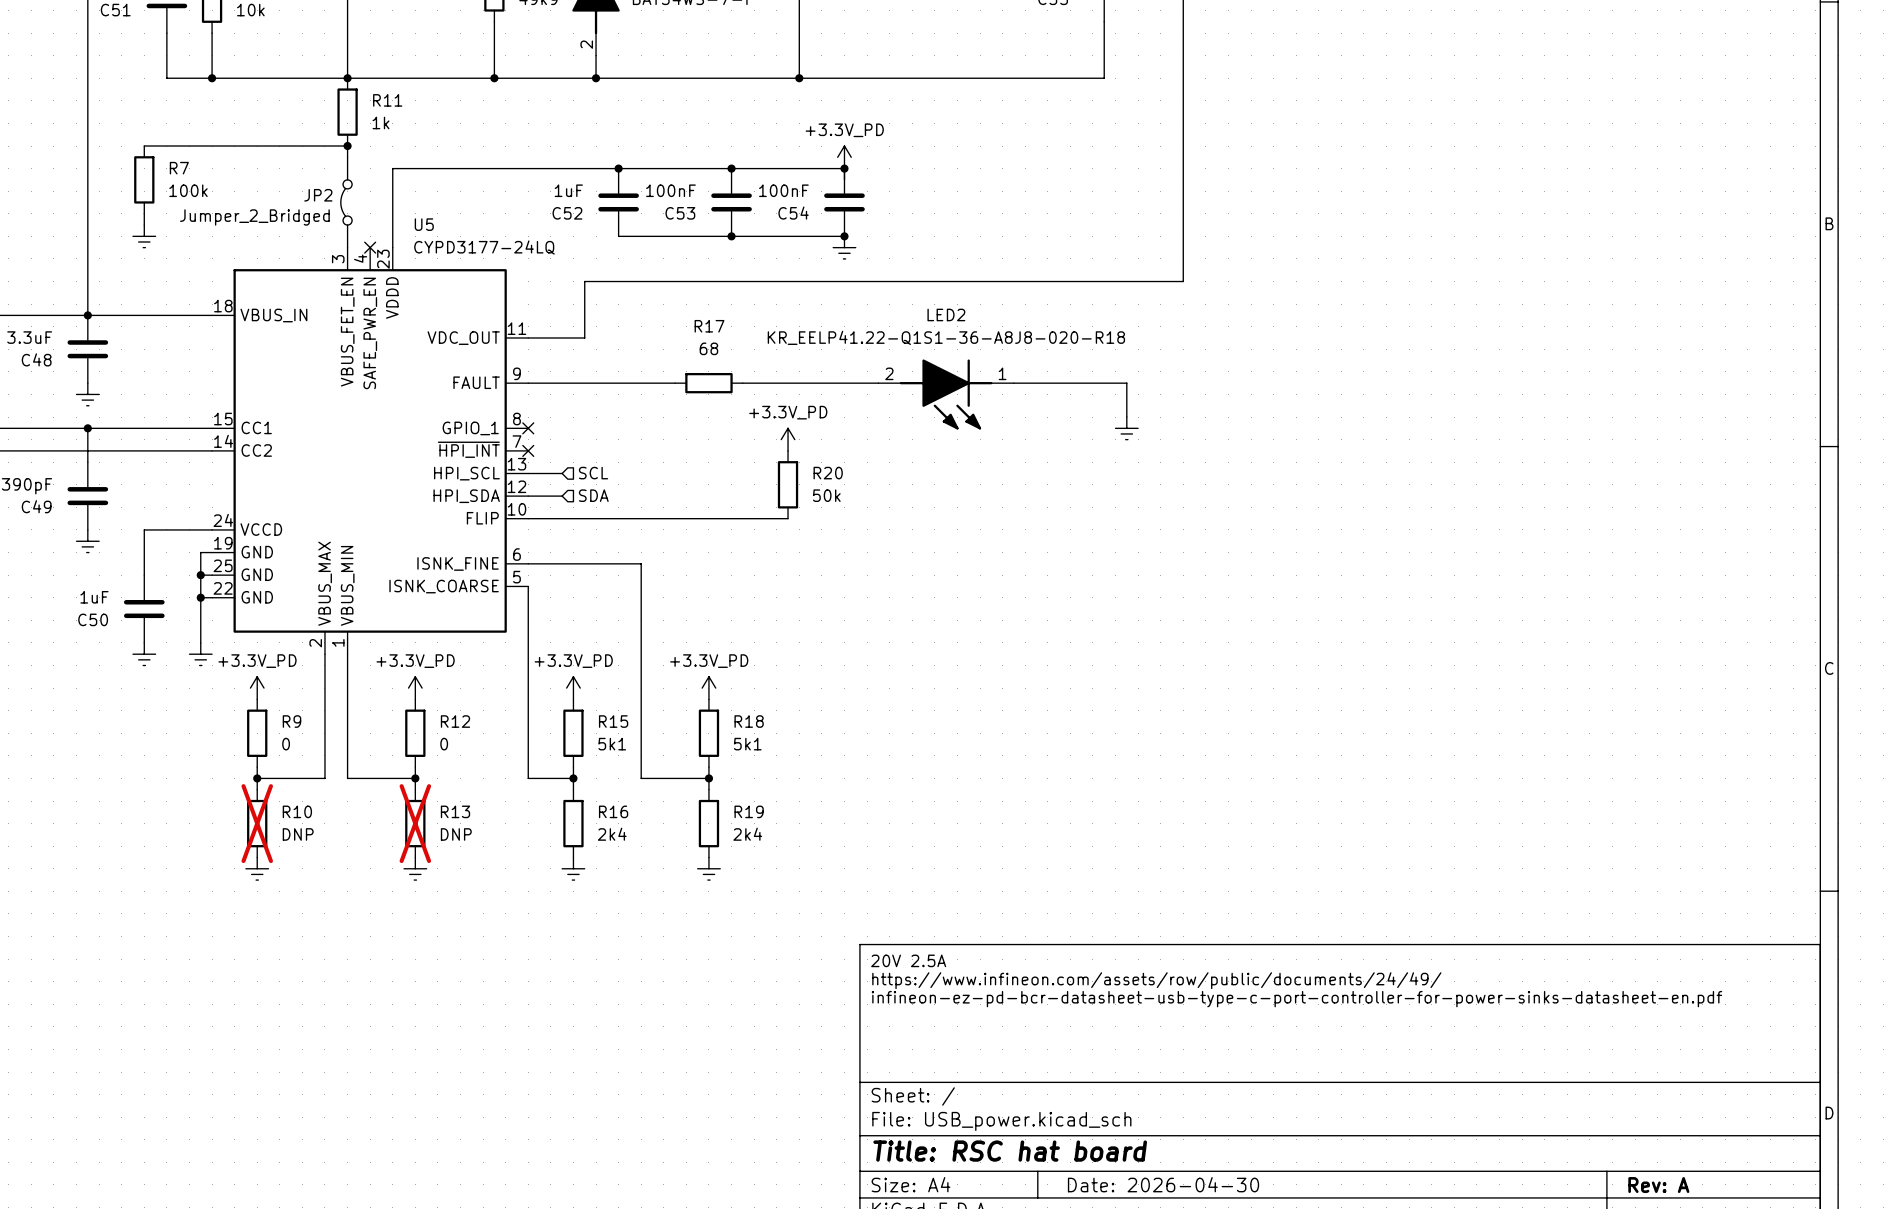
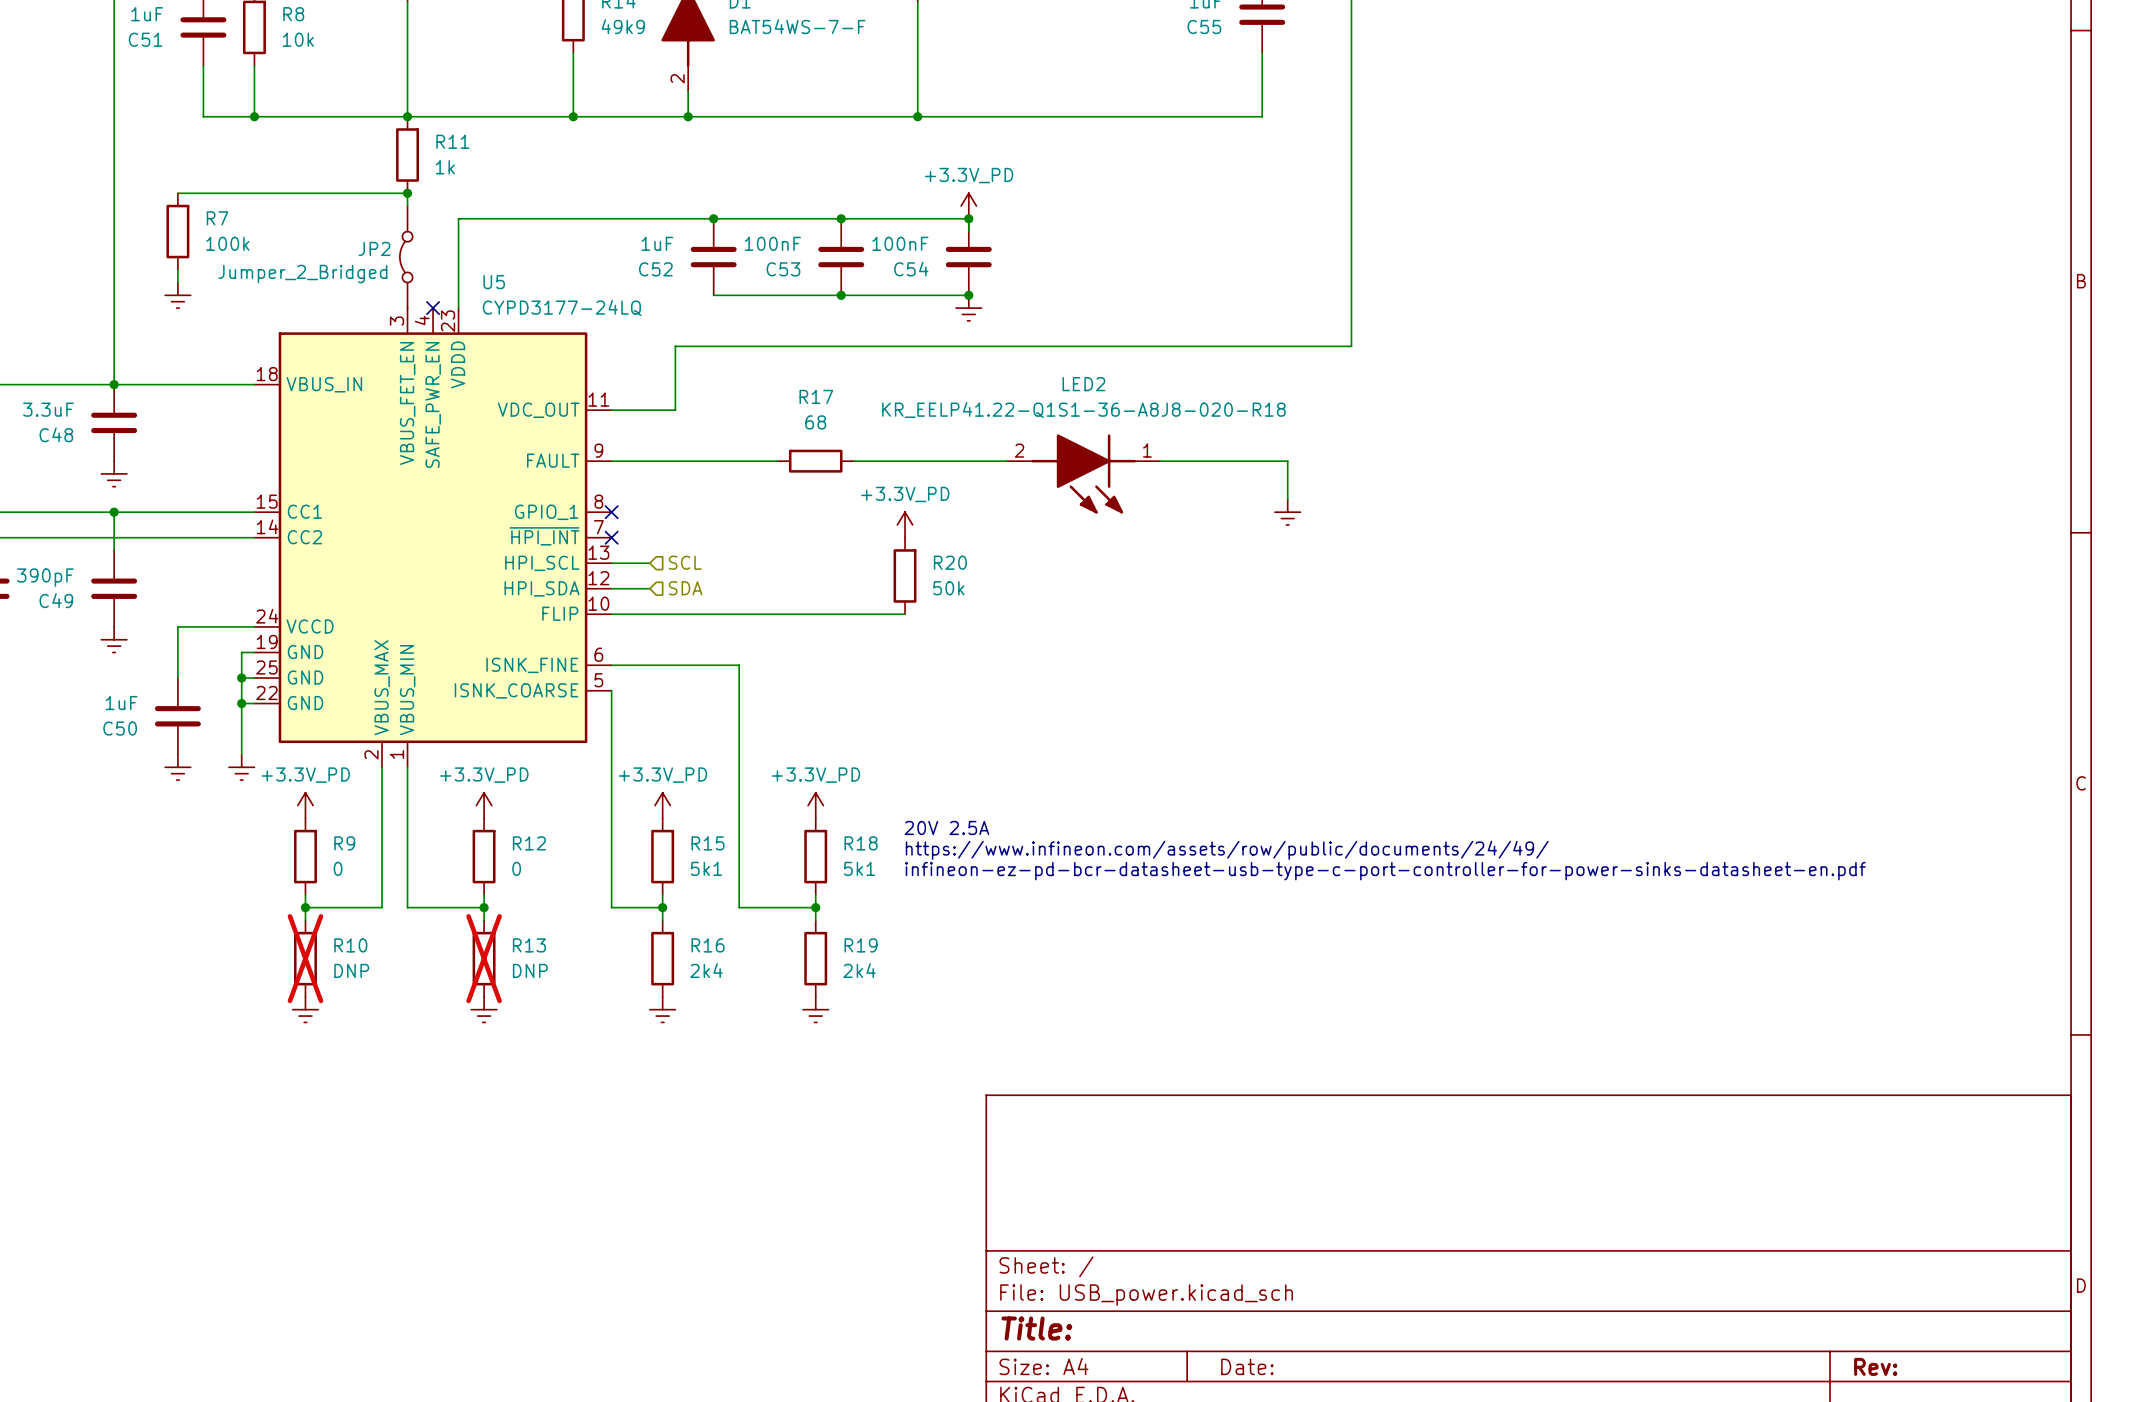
text: none -> 20V 2.5A (946, 827)
text: none -> https://www.infineon.com/assets/row/public/documents/24/49/ (1227, 850)
text: none -> infineon-ez-pd-bcr-datasheet-usb-type-c-port-controller-for-power-sinks-datasheet-en.pdf (1385, 871)
text: 20V 2.5A (908, 960) -> none
text: https://www.infineon.com/assets/row/public/documents/24/49/ (1156, 980) -> none
text: infineon-ez-pd-bcr-datasheet-usb-type-c-port-controller-for-power-sinks-datasheet-en.pdf (1296, 999) -> none
title block: Title: RSC hat board (1010, 1151) -> Title: (1036, 1328)
title block: Date: 2026-04-30 (1163, 1184) -> Date: (1247, 1366)
title block: Rev: A (1658, 1185) -> Rev: (1875, 1366)

